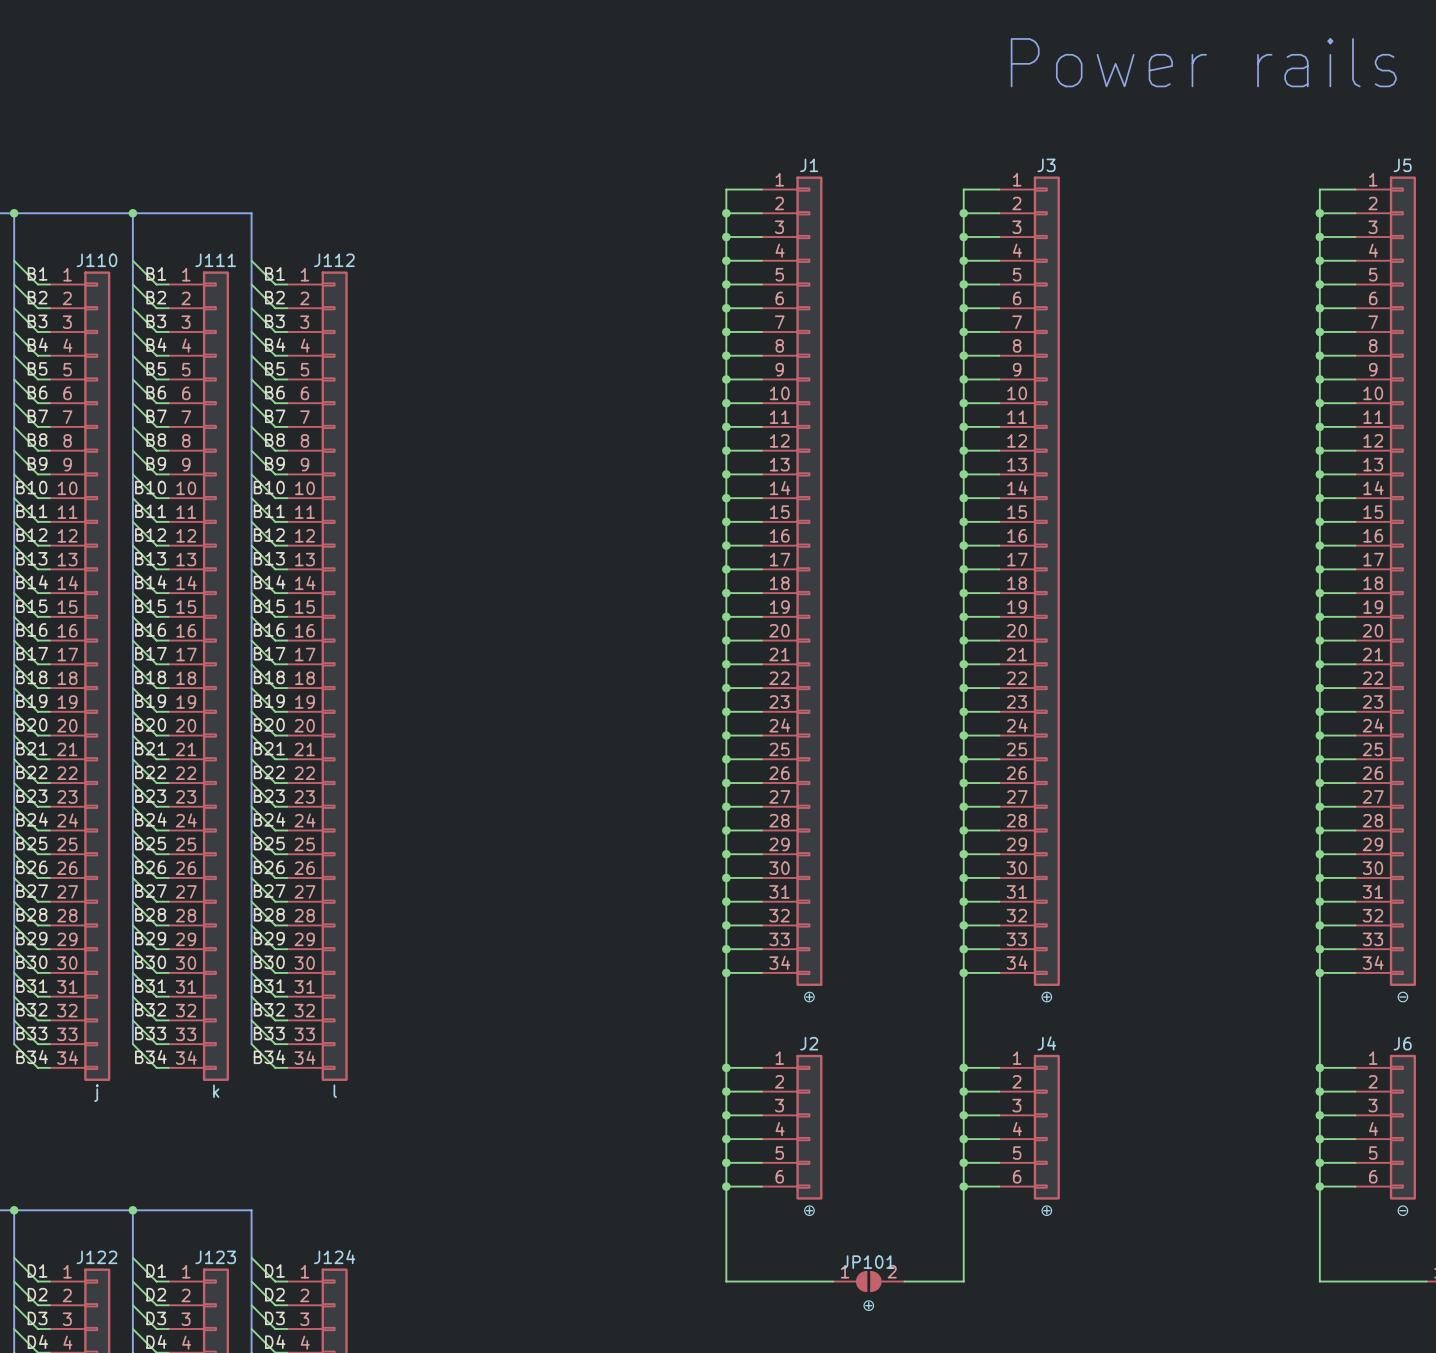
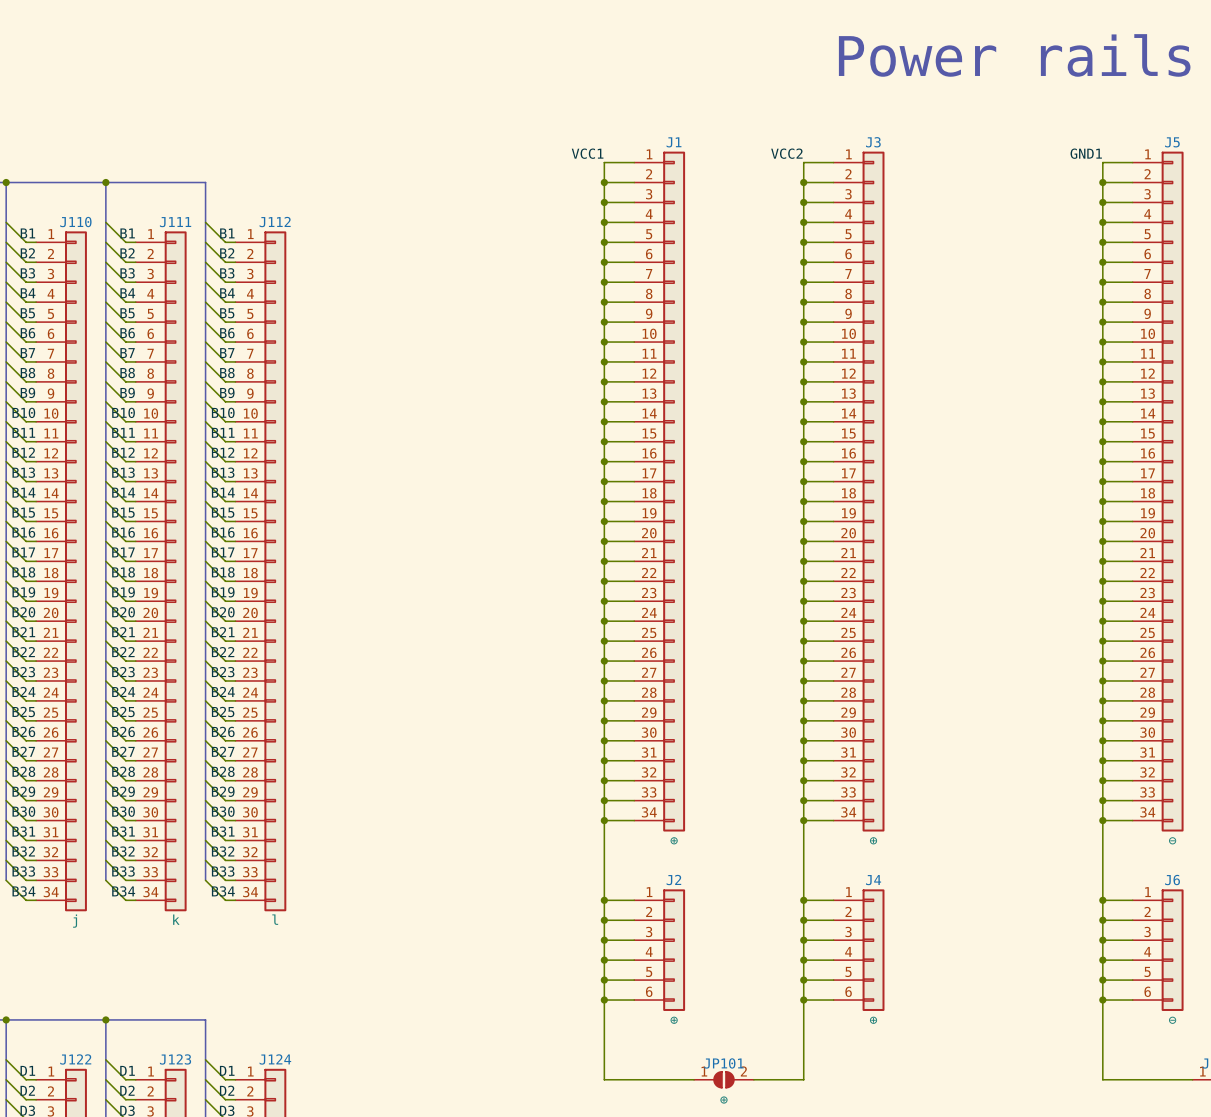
label: none -> VCC1 (587, 153)
label: none -> VCC2 (786, 153)
label: none -> GND1 (1086, 153)

